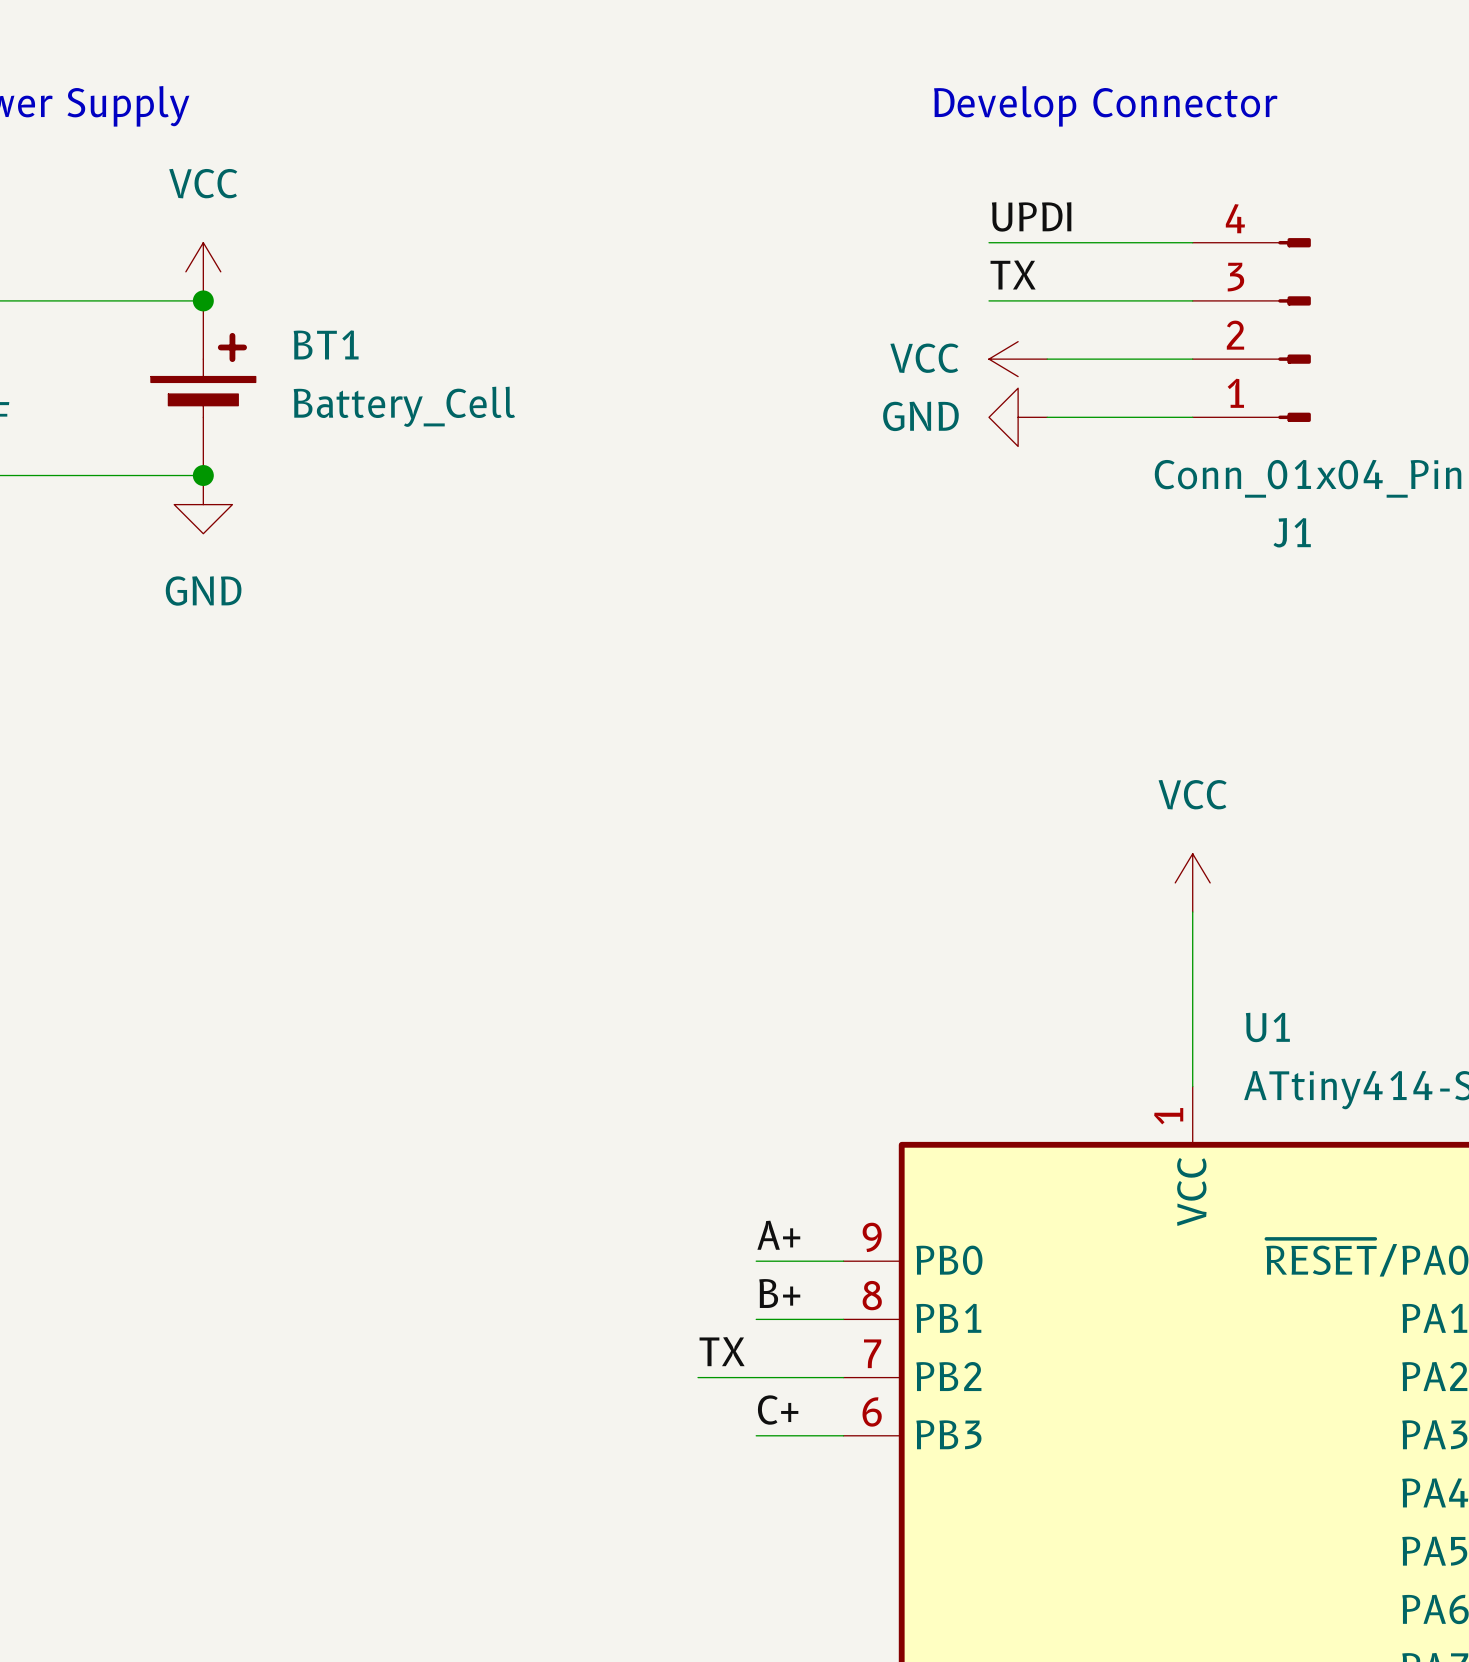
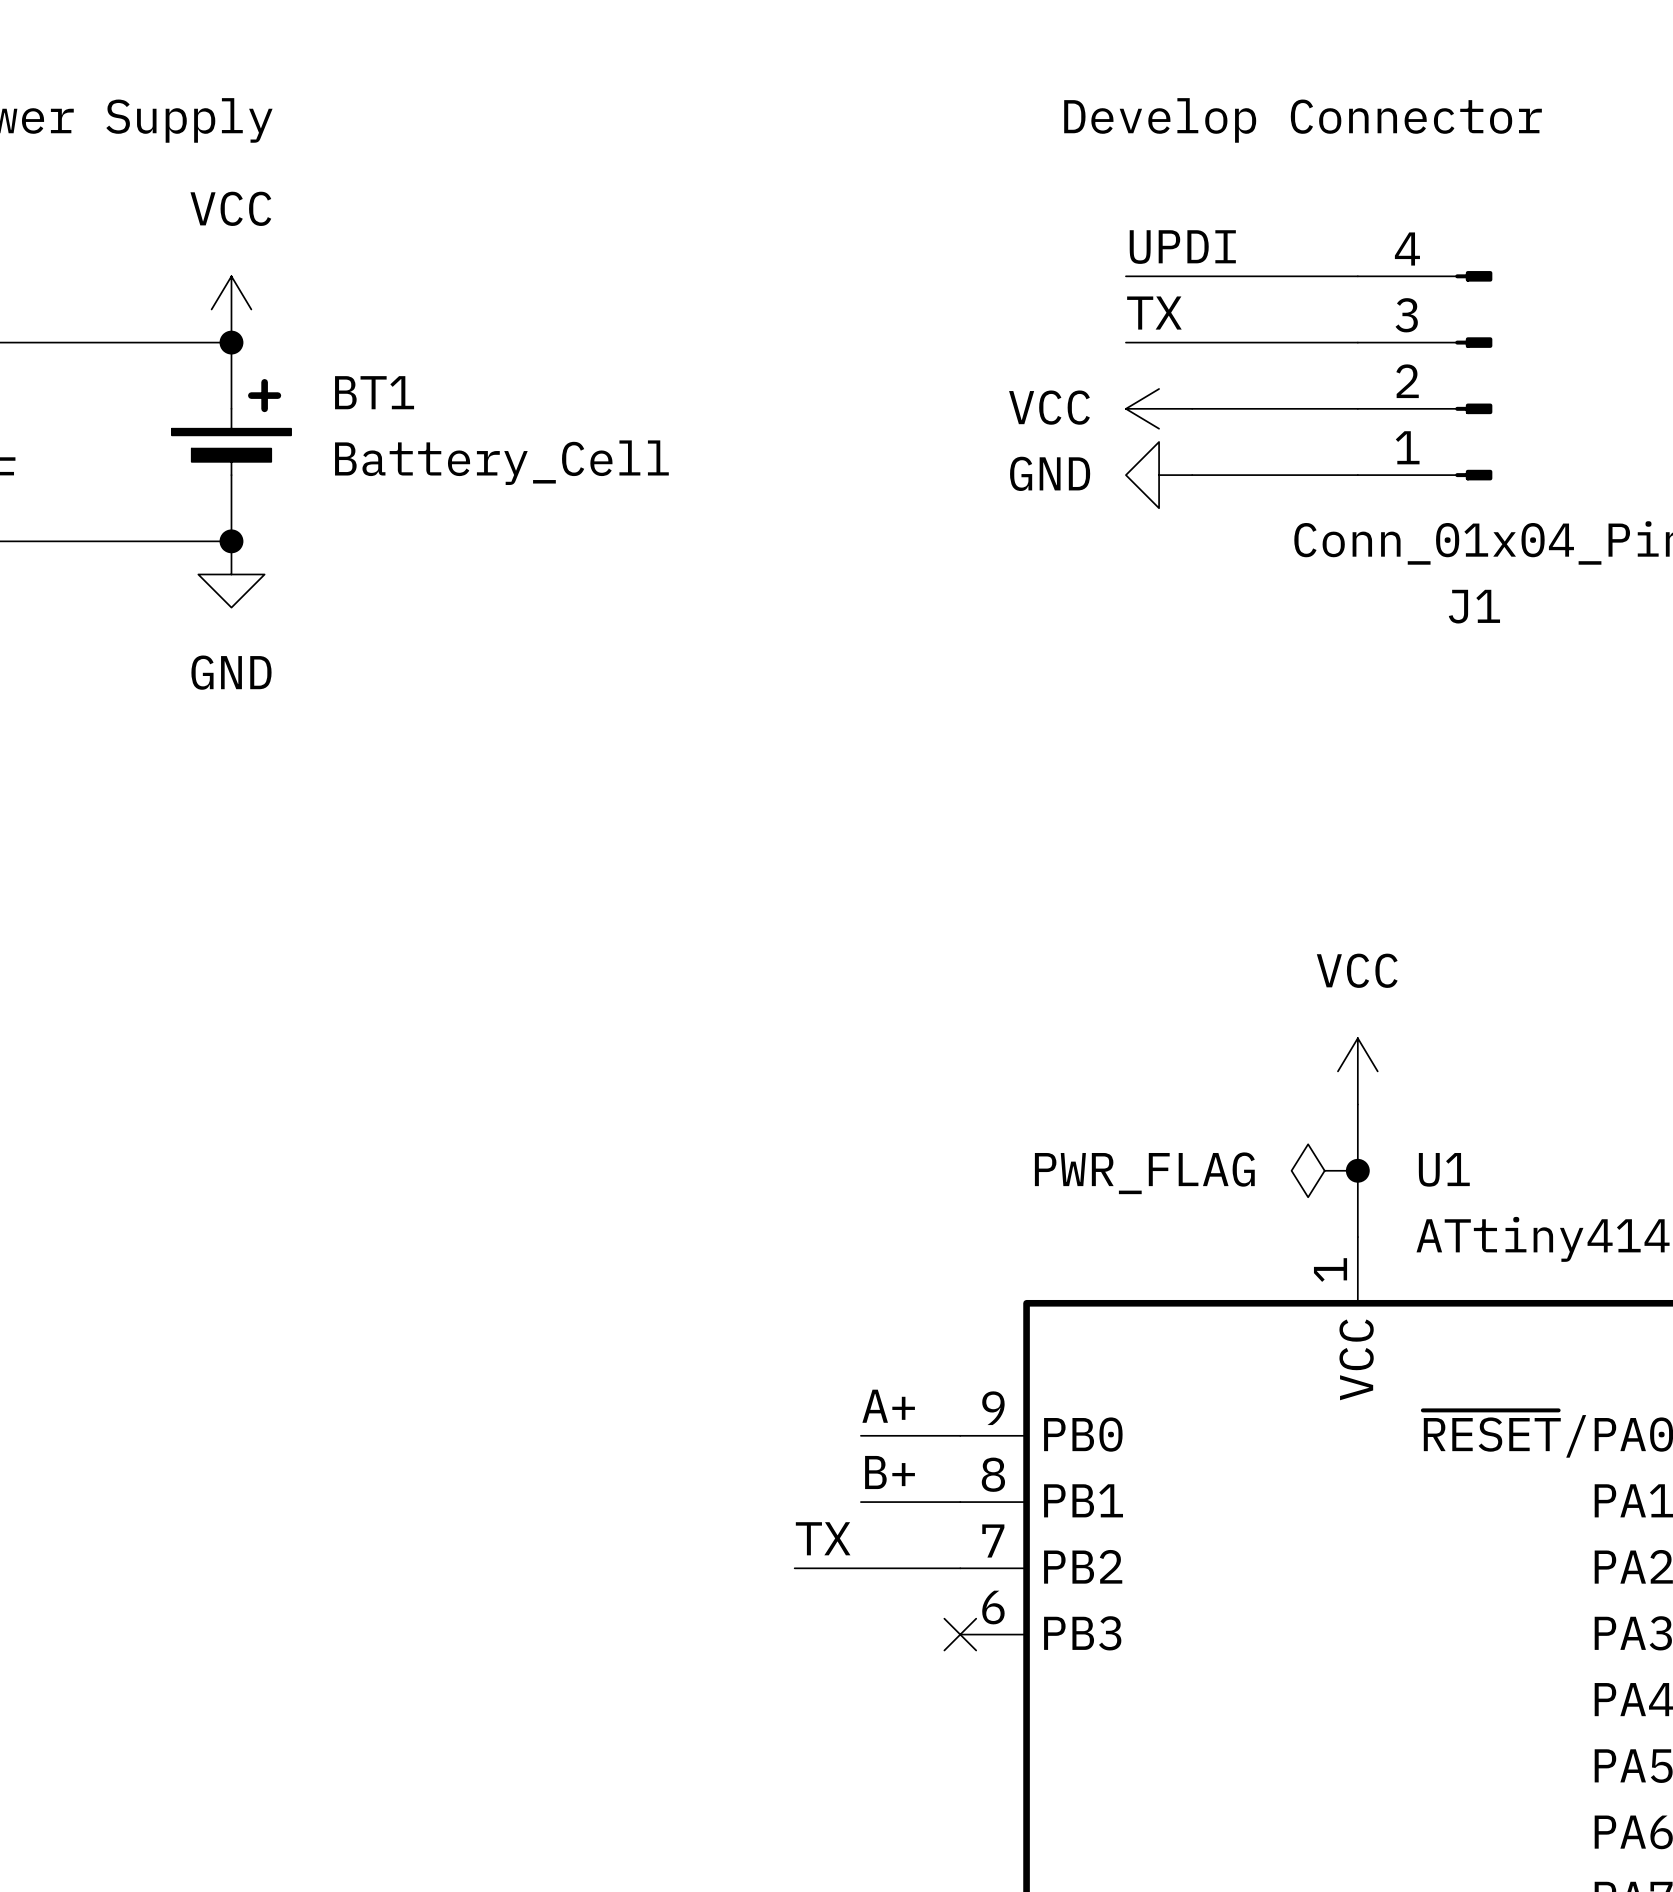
power symbol position: VCC (1192, 882) -> VCC (1357, 1071)
power symbol: none -> PWR_FLAG (1324, 1170)
junction: none -> (1357, 1170)
label: C+ (778, 1410) -> none
wire: (756, 1435) (843, 1435) -> none
no-connect mark: none -> (960, 1634)

